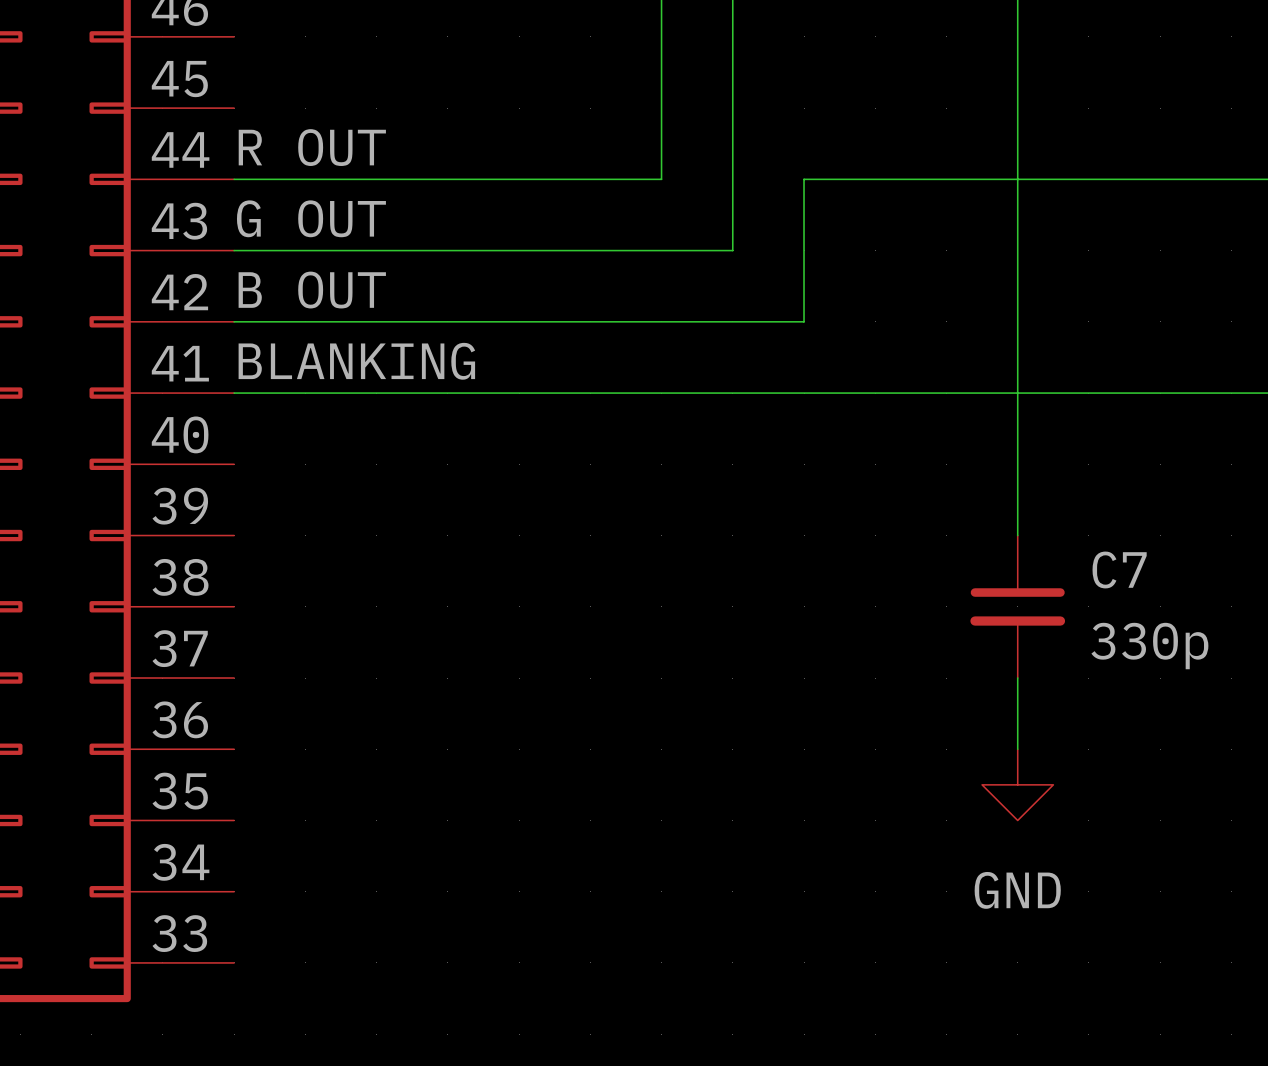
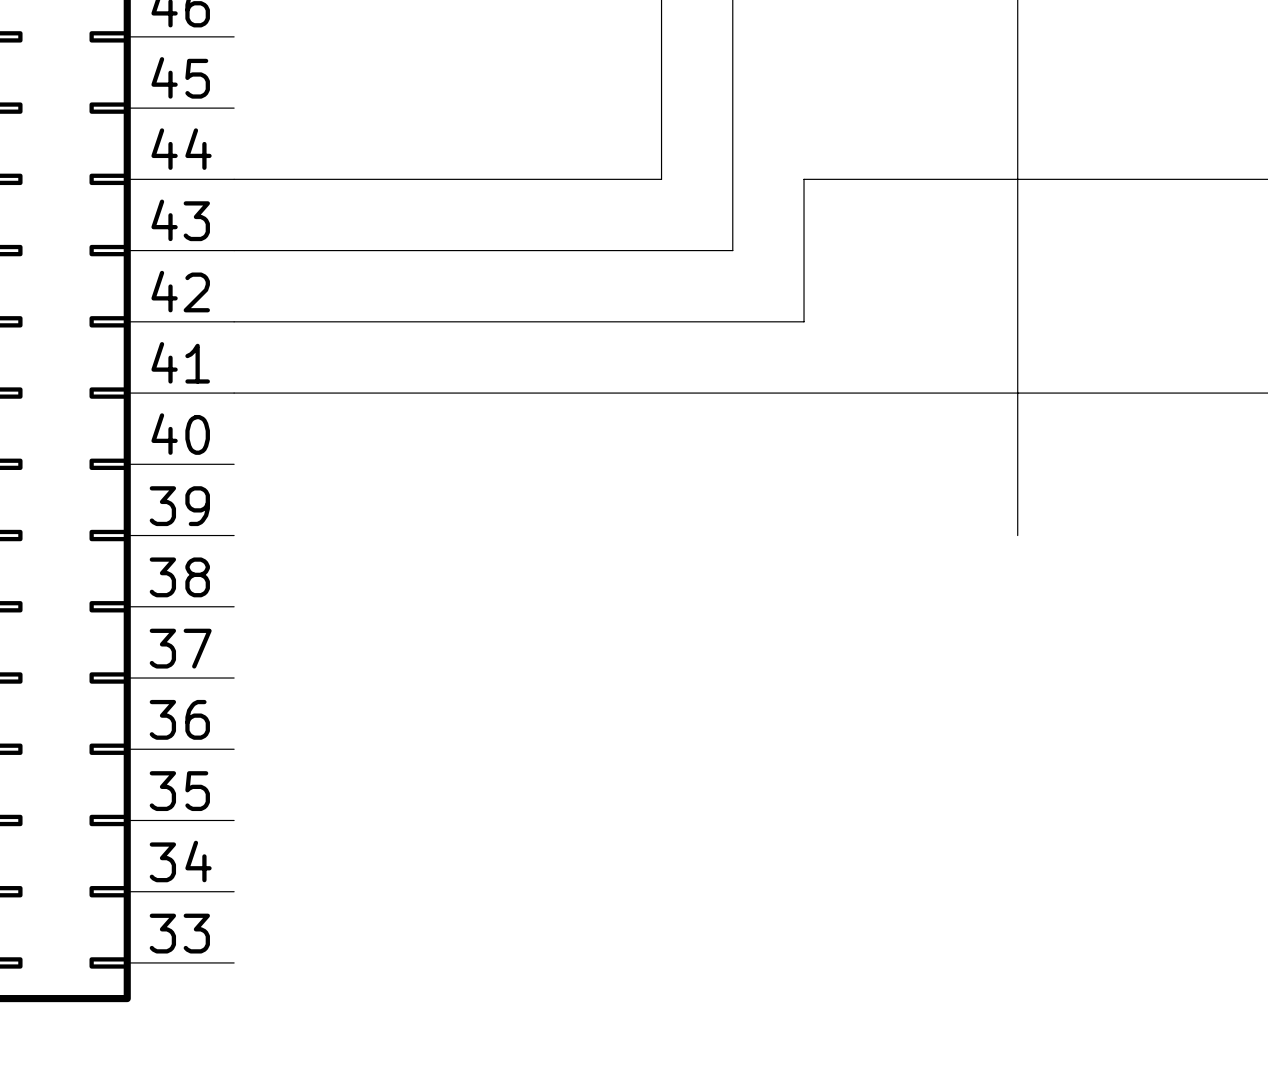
label: R OUT (312, 147) -> none
label: G OUT (311, 218) -> none
label: B OUT (312, 290) -> none
label: BLANKING (356, 361) -> none
C7: 330p (1017, 606) -> none
wire: (1017, 678) (1017, 749) -> none
power symbol: GND (1017, 784) -> none

